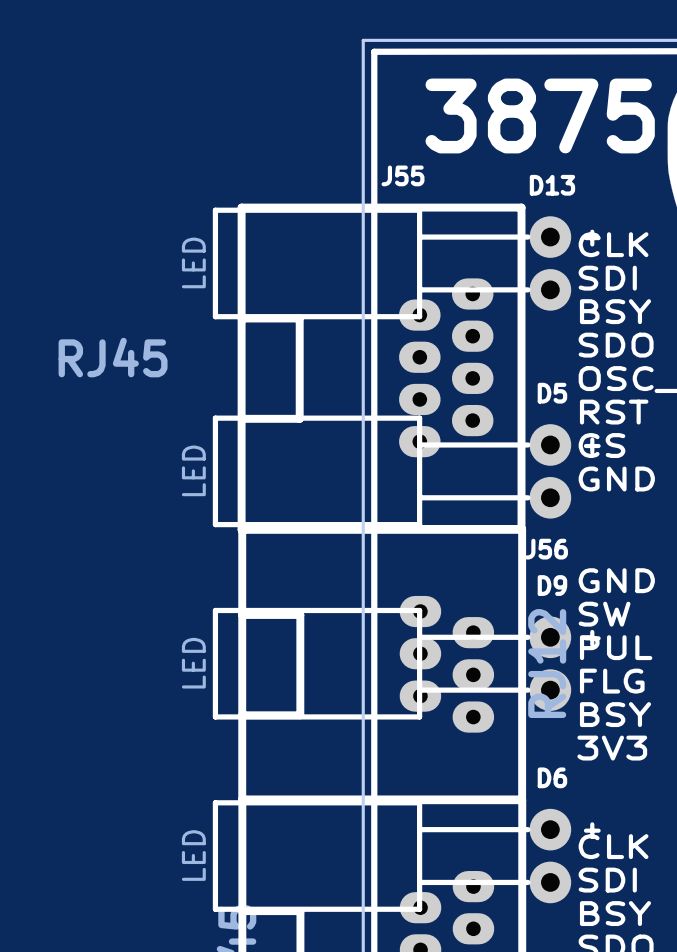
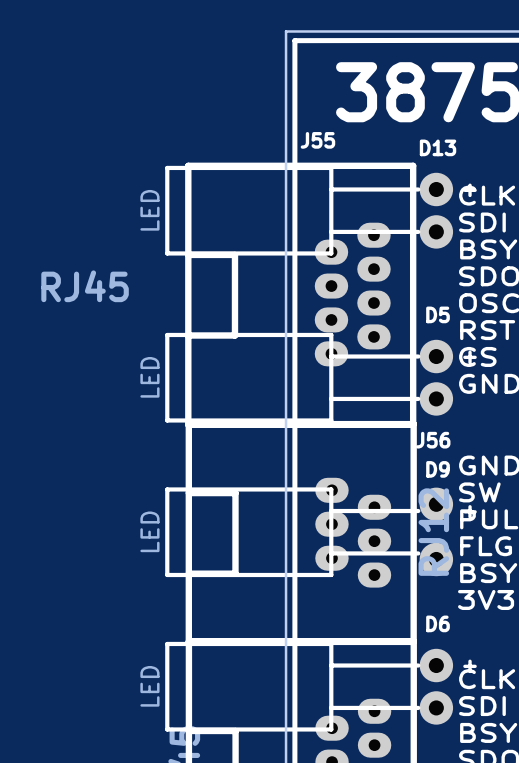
D9 footprint: [212, 607, 572, 720] -> [165, 487, 454, 578]

